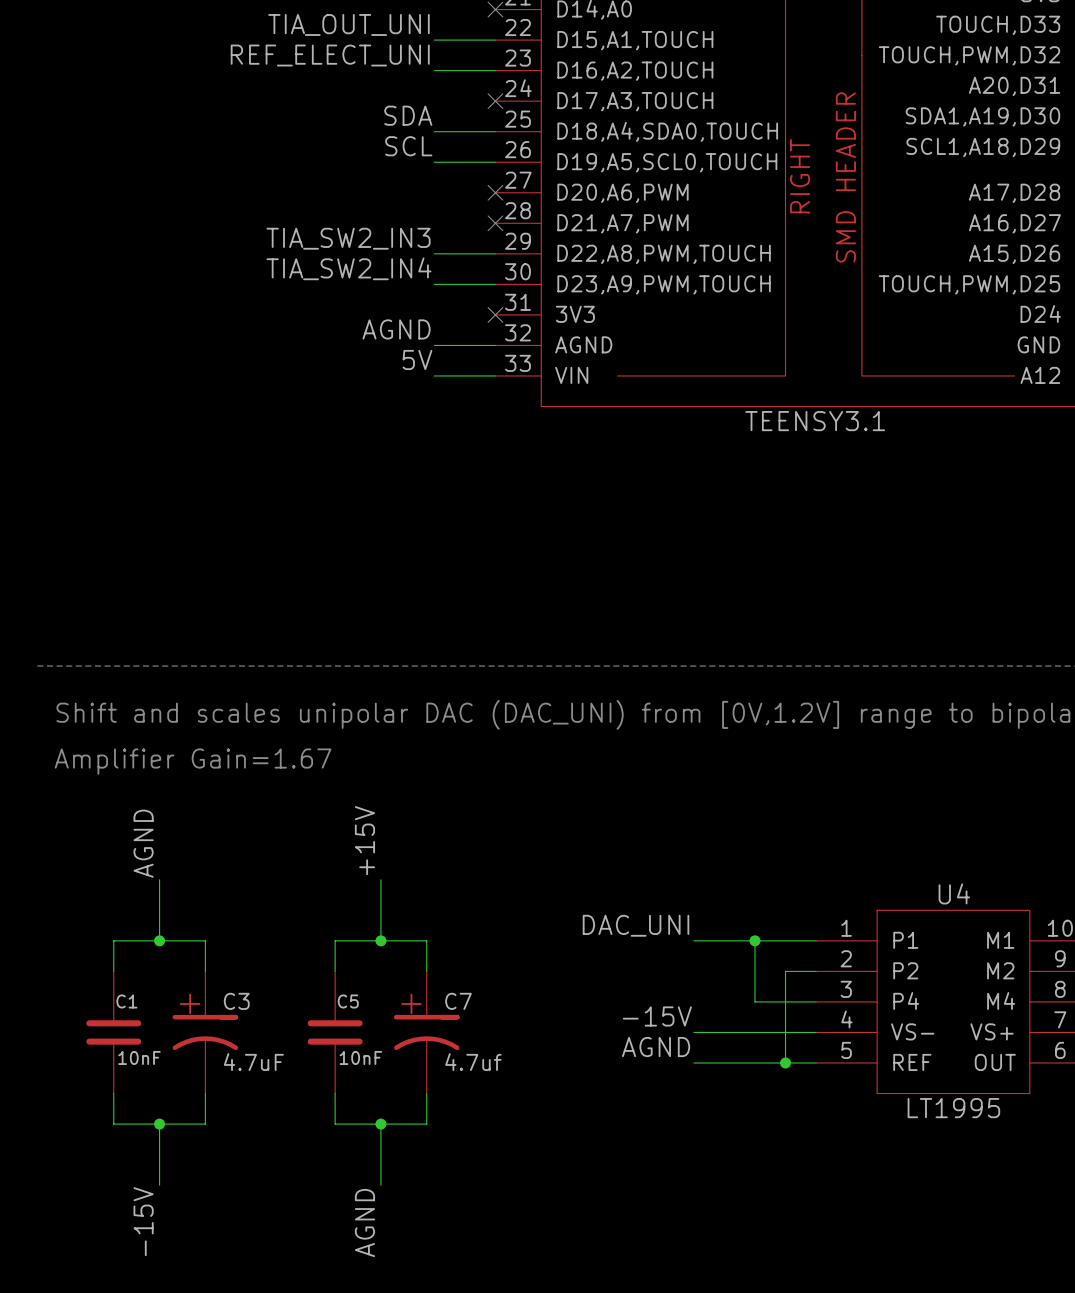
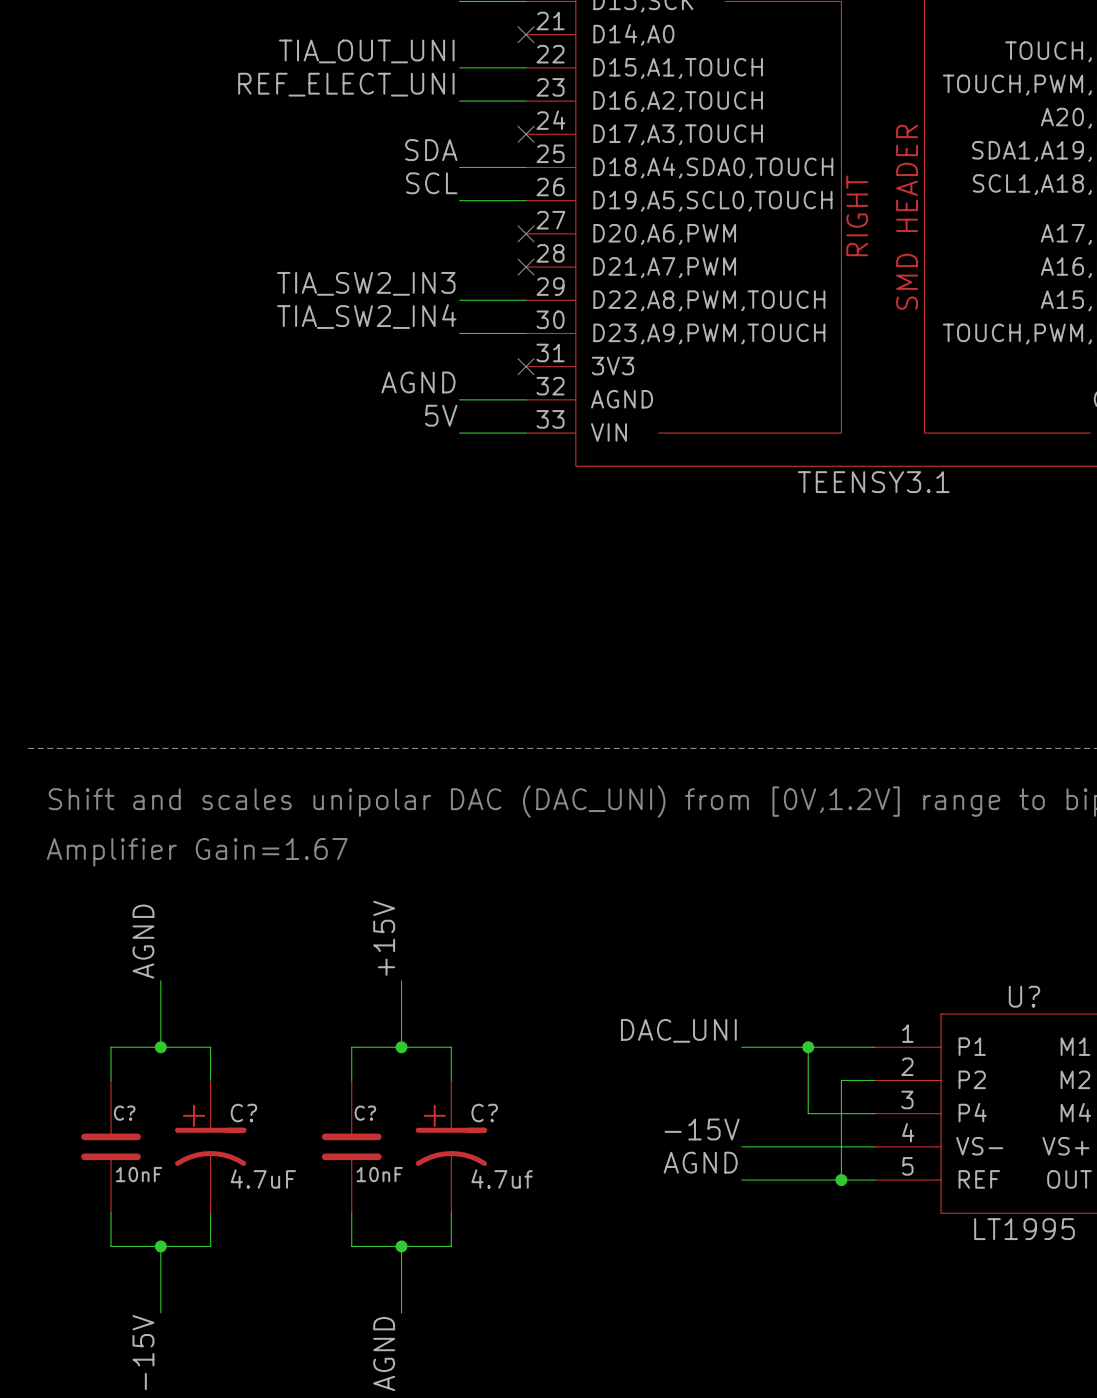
U4 name: U4 (954, 893) -> U? (1024, 996)
C1 name: C1 (126, 1001) -> C? (124, 1113)
C3 name: C3 (236, 1001) -> C? (243, 1113)
C5 name: C5 (348, 1001) -> C? (365, 1113)
C7 name: C7 (458, 1001) -> C? (484, 1113)

